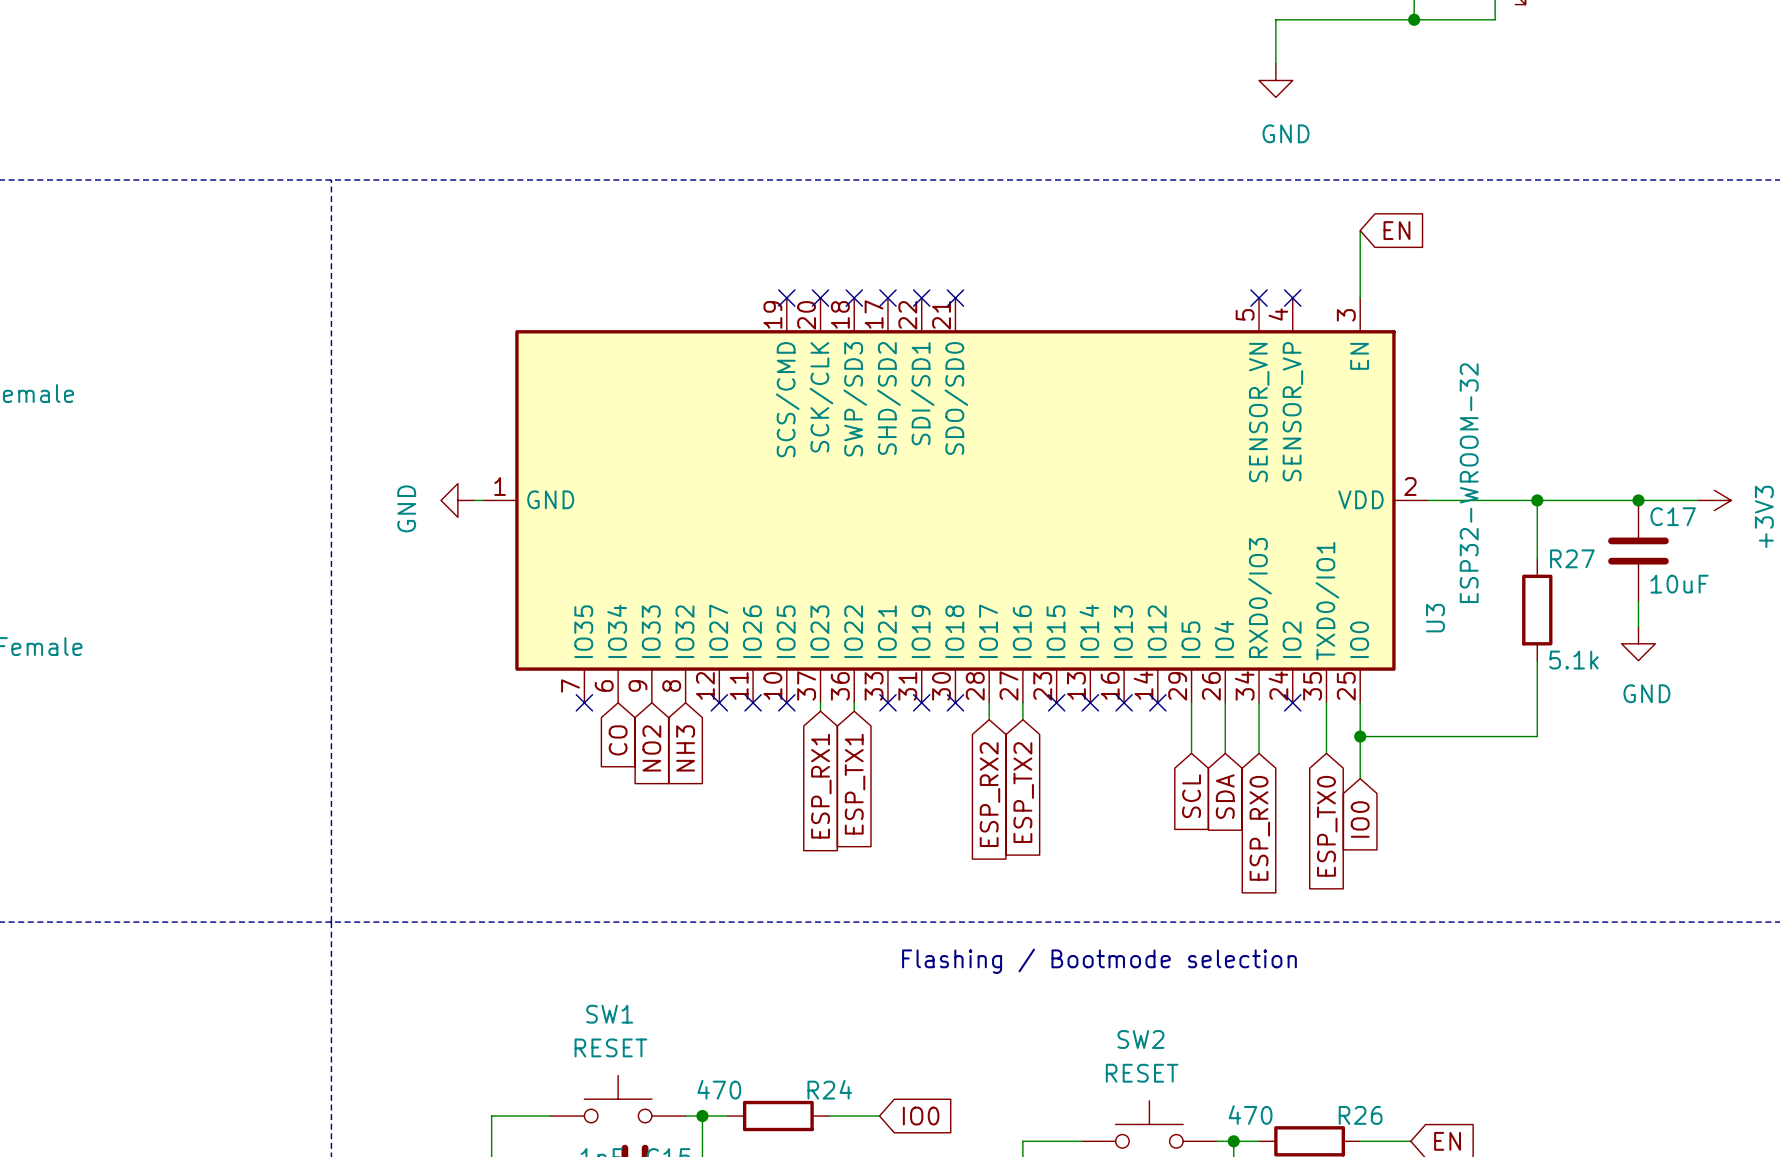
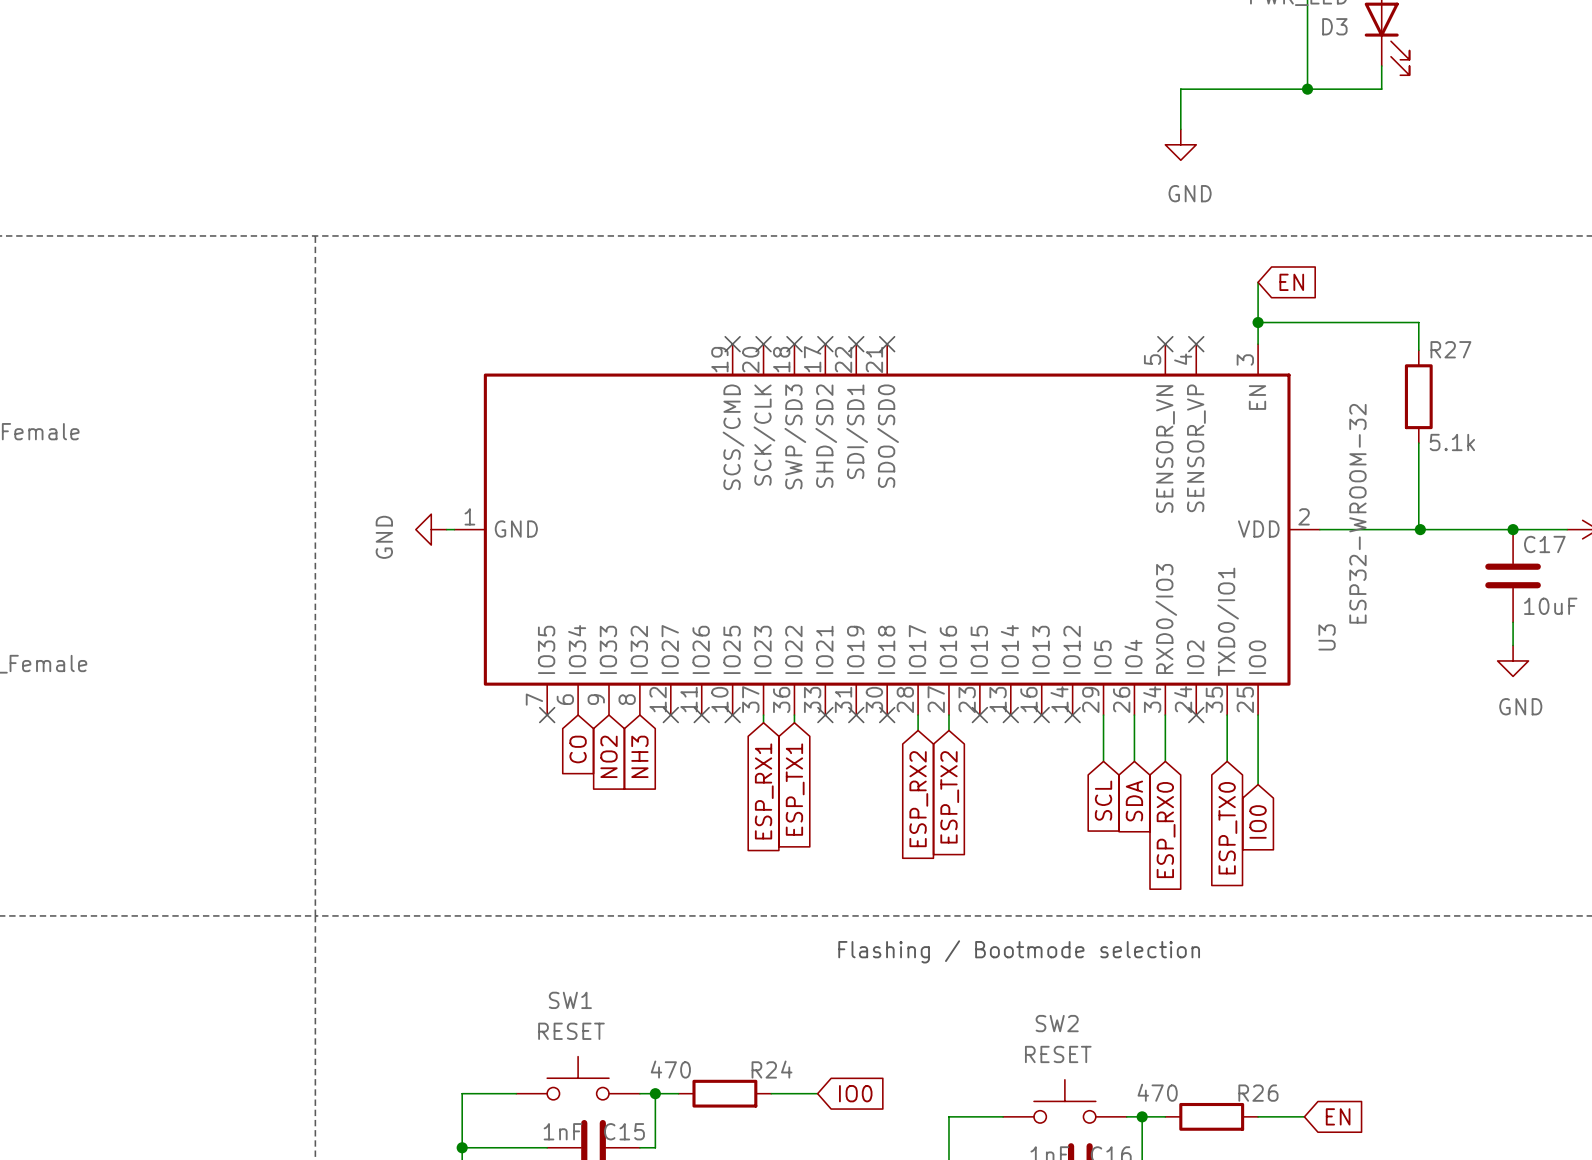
wire: none -> (1258, 322) (1418, 322) (1418, 350)
junction: none -> (1258, 322)
wire: none -> (1418, 443) (1418, 529)
wire: (1537, 500) (1537, 559) -> none
R27 position: (1537, 610) -> (1418, 396)
wire: (1537, 660) (1537, 736) (1360, 736) -> none
junction: (1360, 736) -> none

